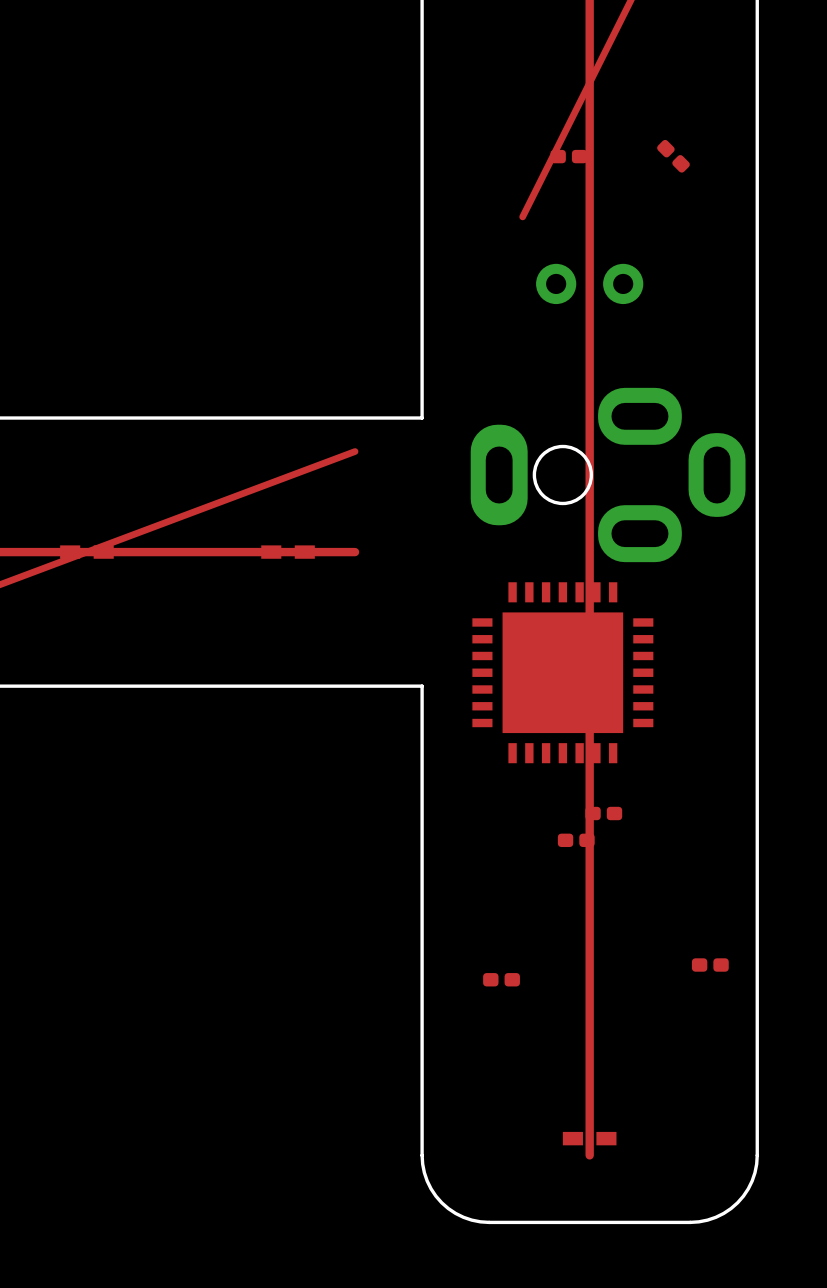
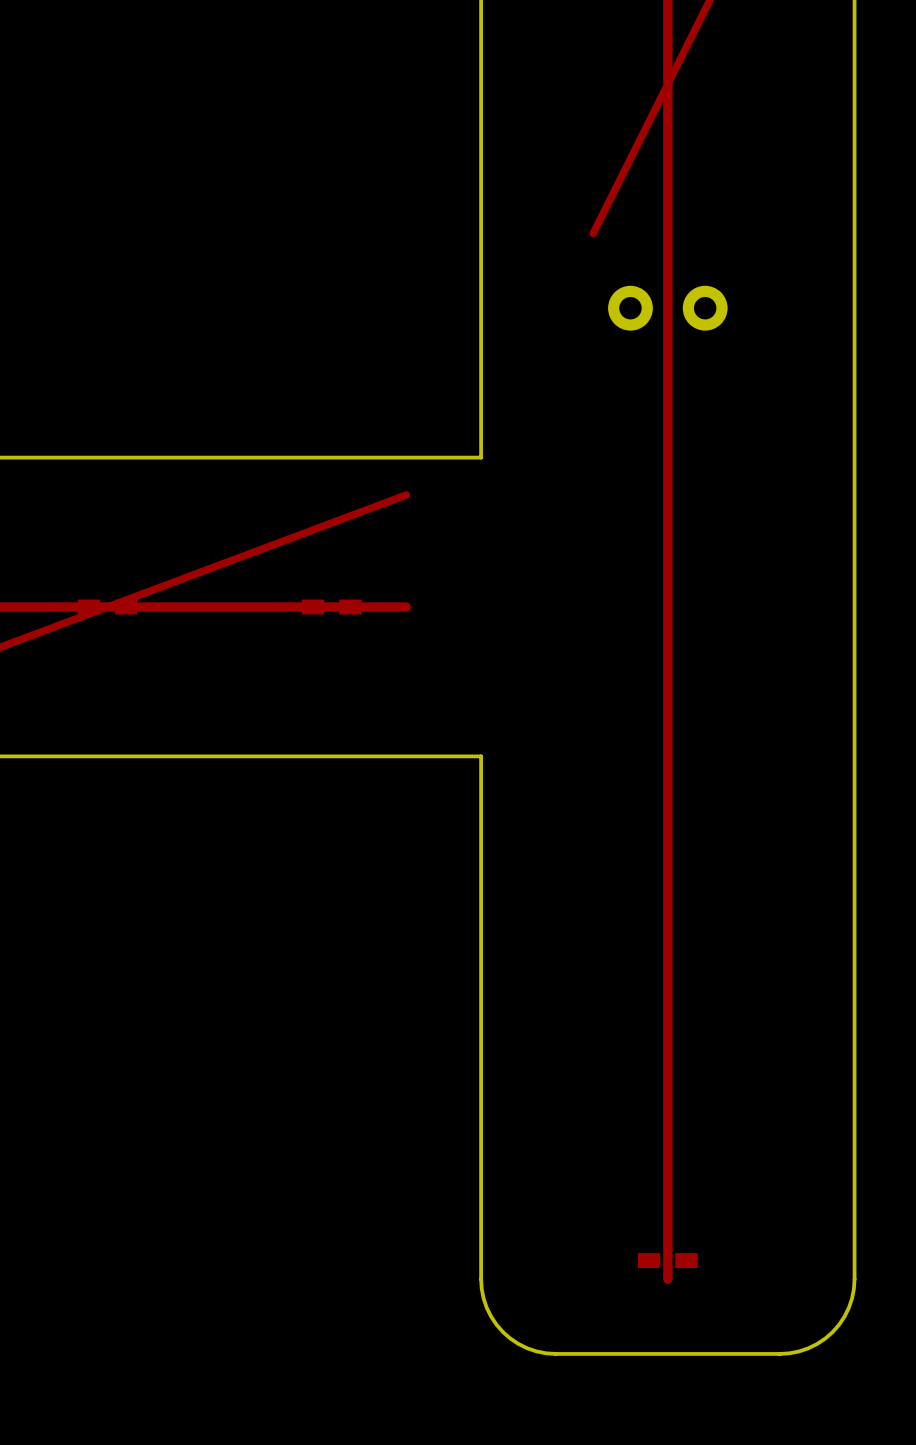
part: (568, 156) -> none
part: (673, 156) -> none
part: (608, 474) -> none
part: (562, 672) -> none
part: (603, 813) -> none
part: (576, 840) -> none
part: (710, 965) -> none
part: (501, 979) -> none

